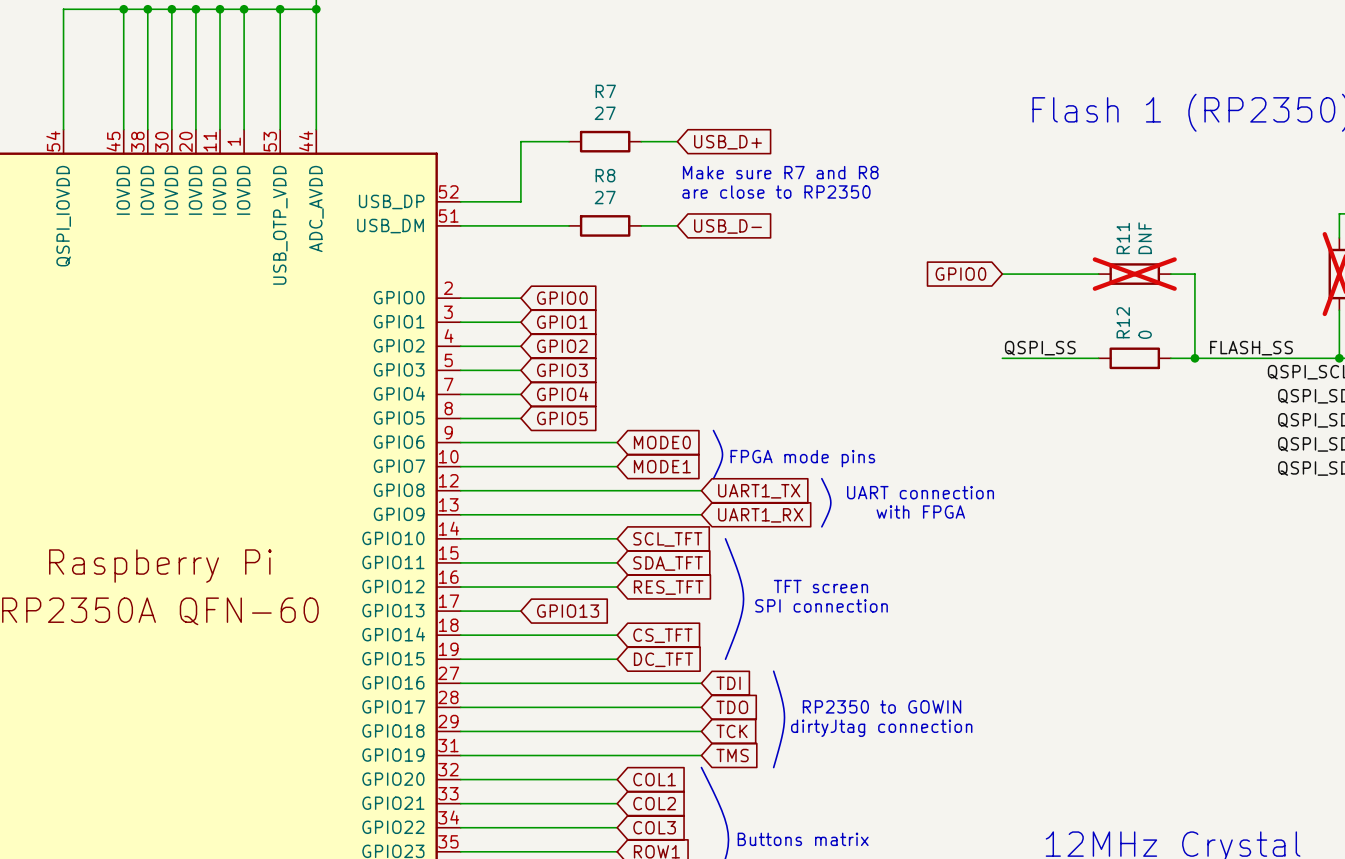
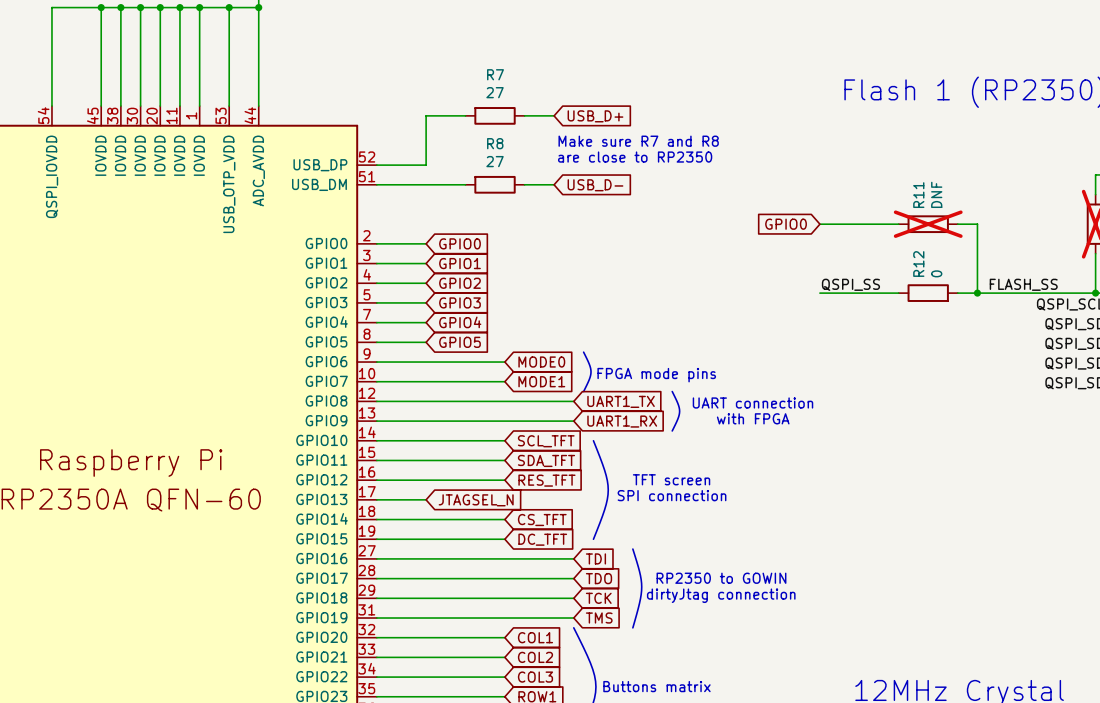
global label: GPIO13 (568, 611) -> JTAGSEL_N (476, 500)

